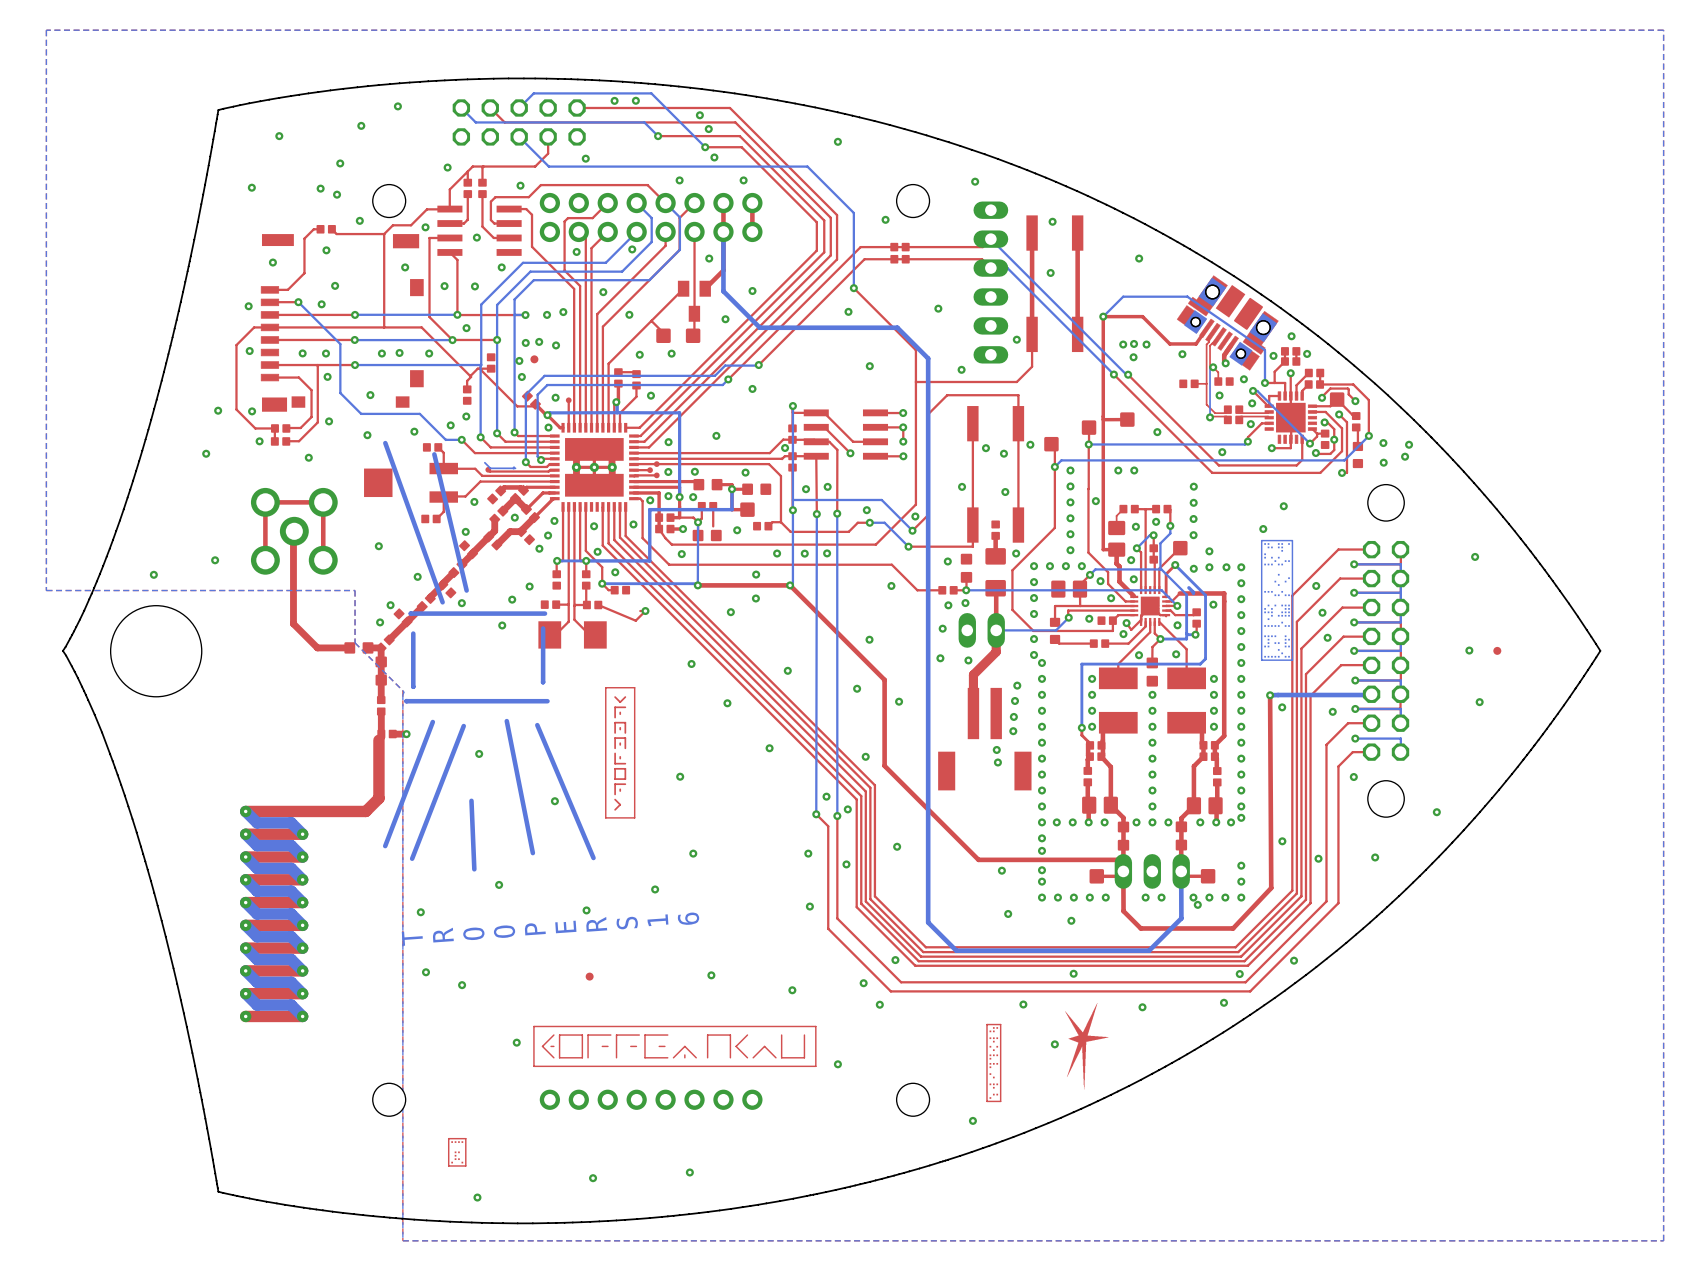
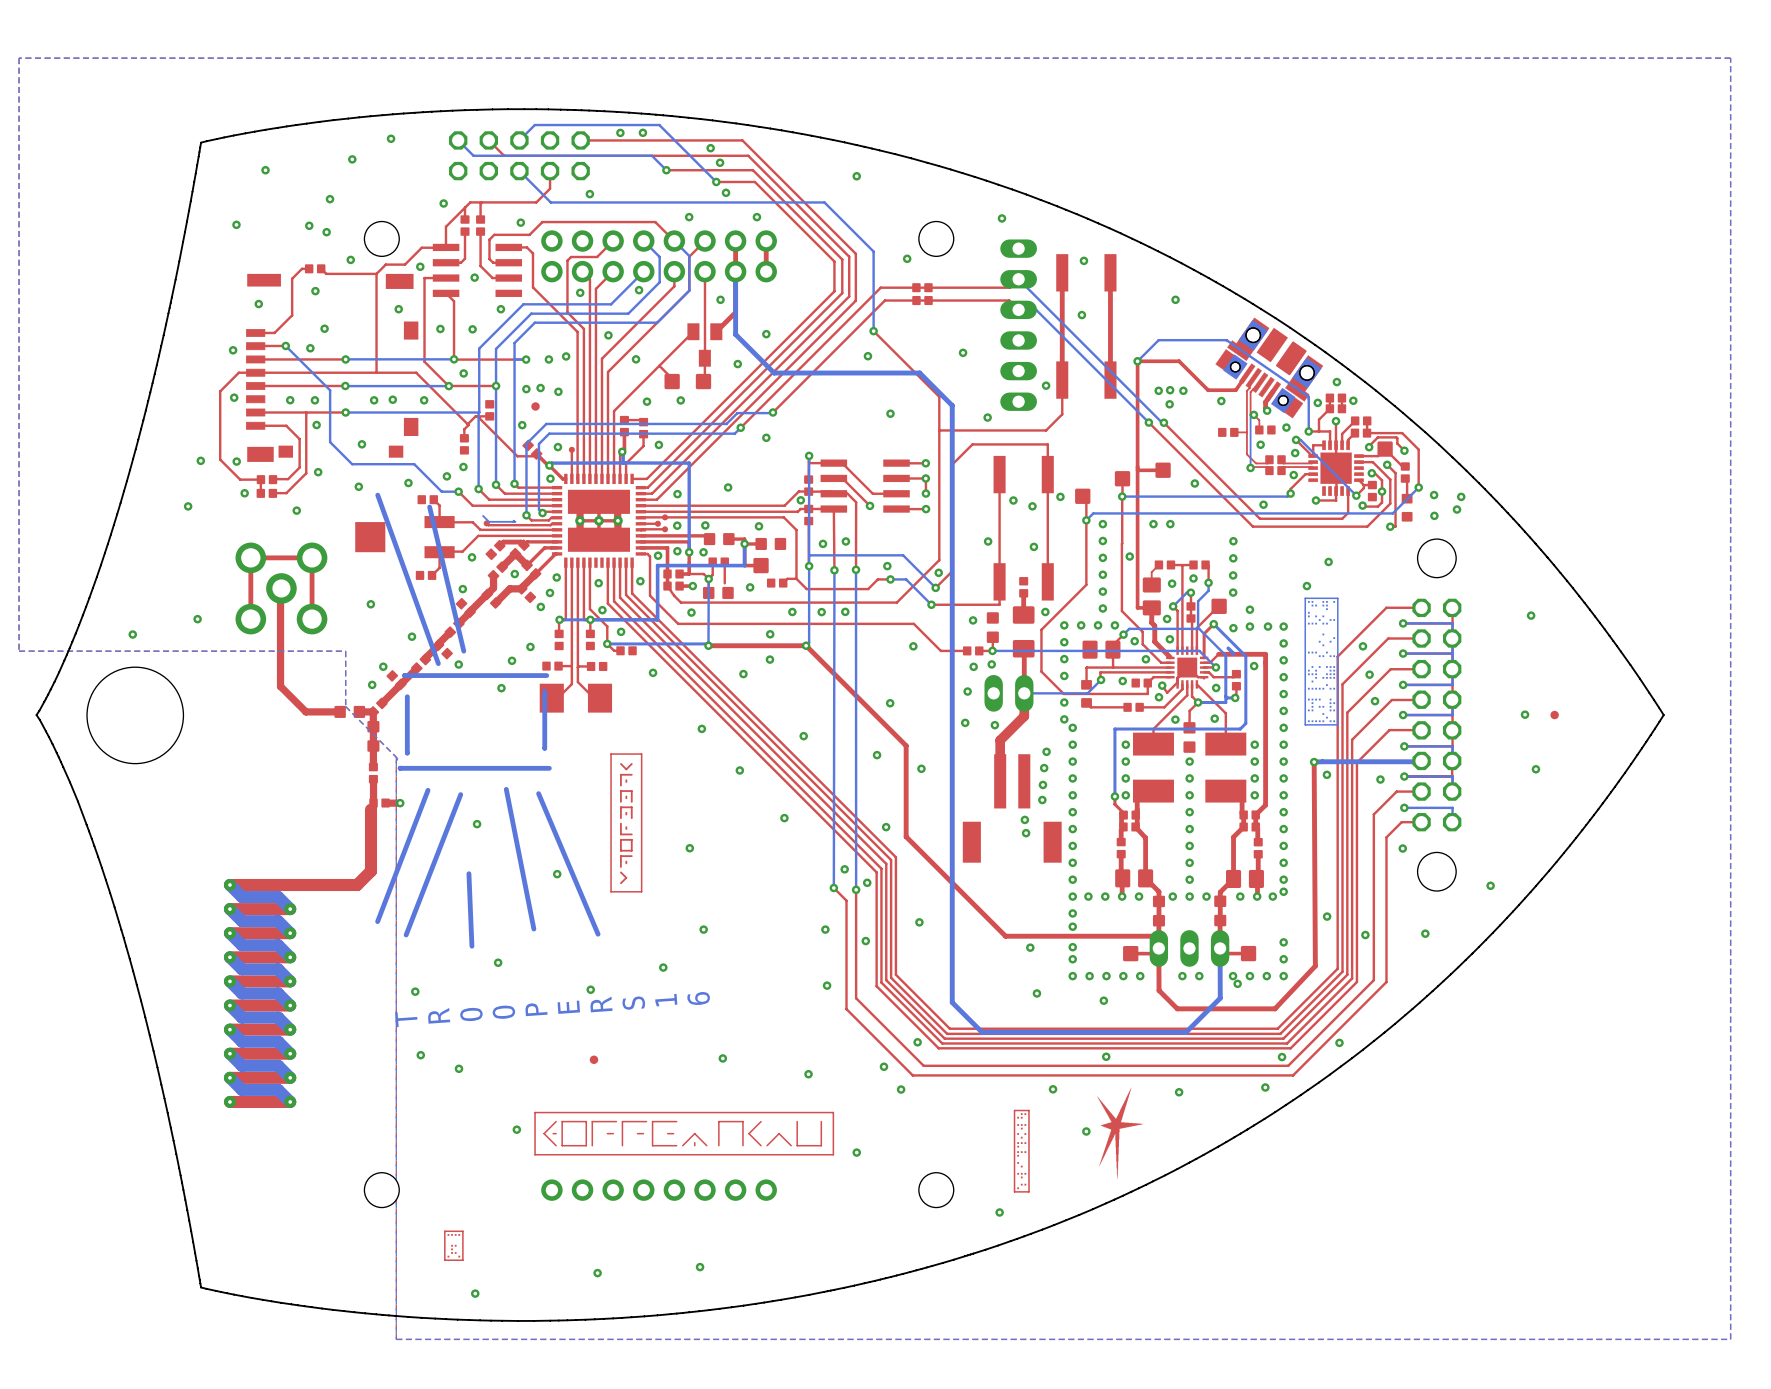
via: (519, 360) -> none
top track: (586, 585) (586, 605) -> none
top track: (598, 604) (635, 620) (645, 611) (640, 611) -> none

